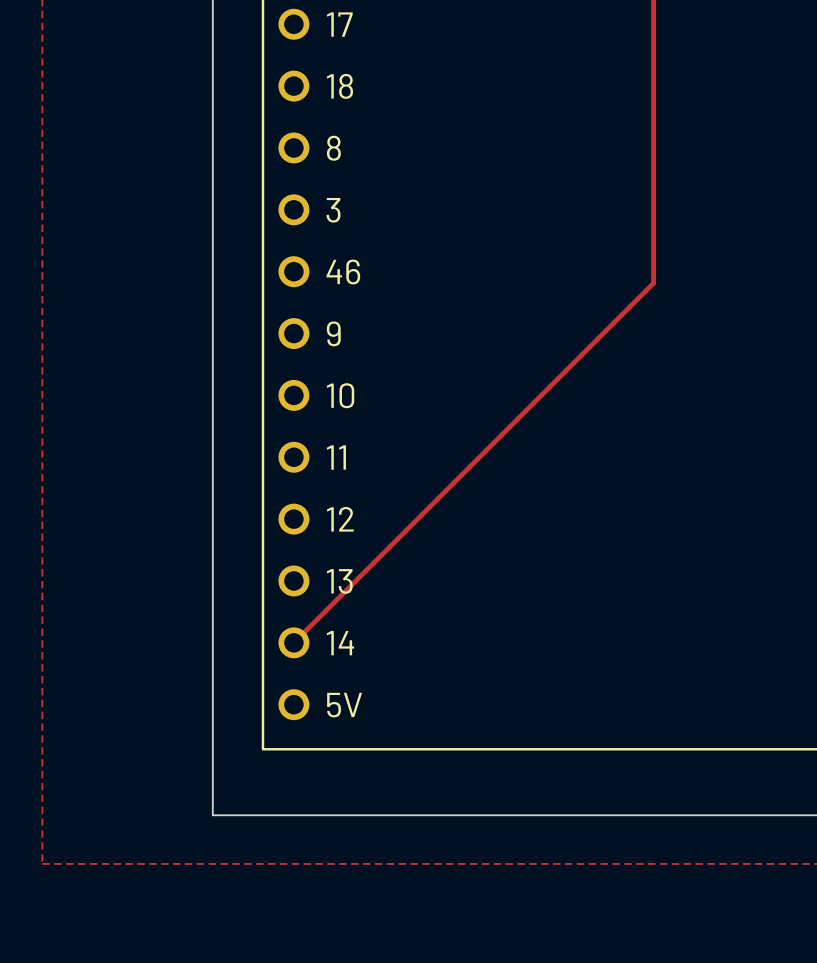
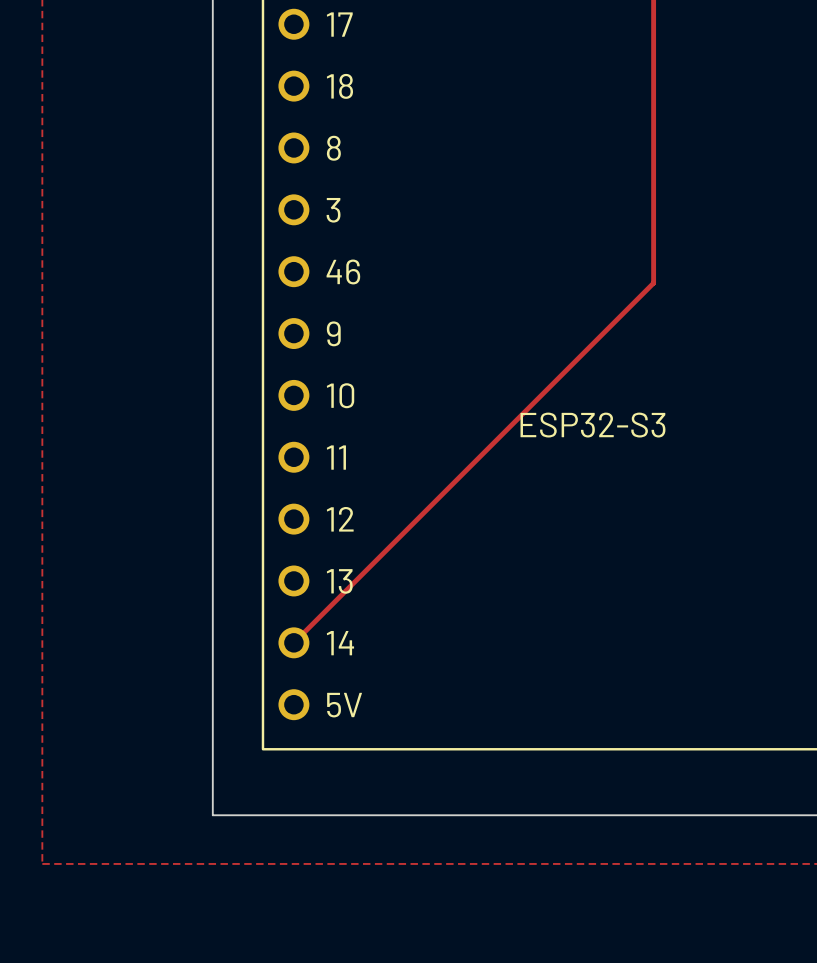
text: none -> ESP32-S3 (592, 425)

